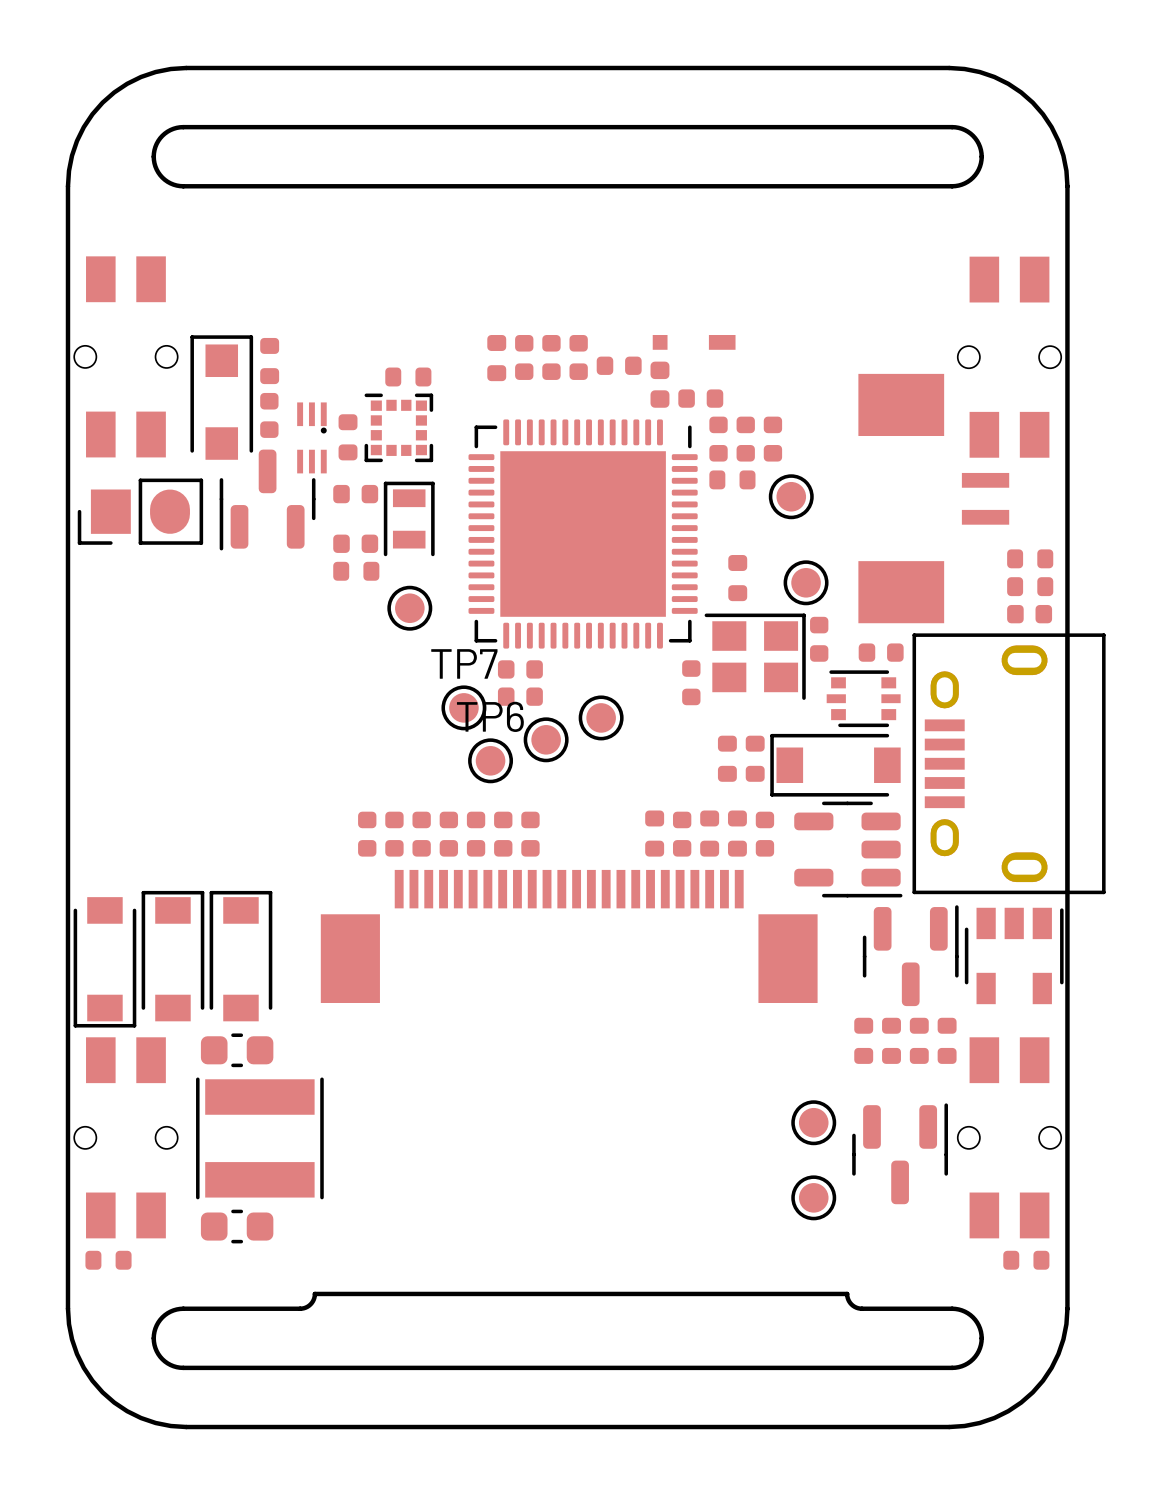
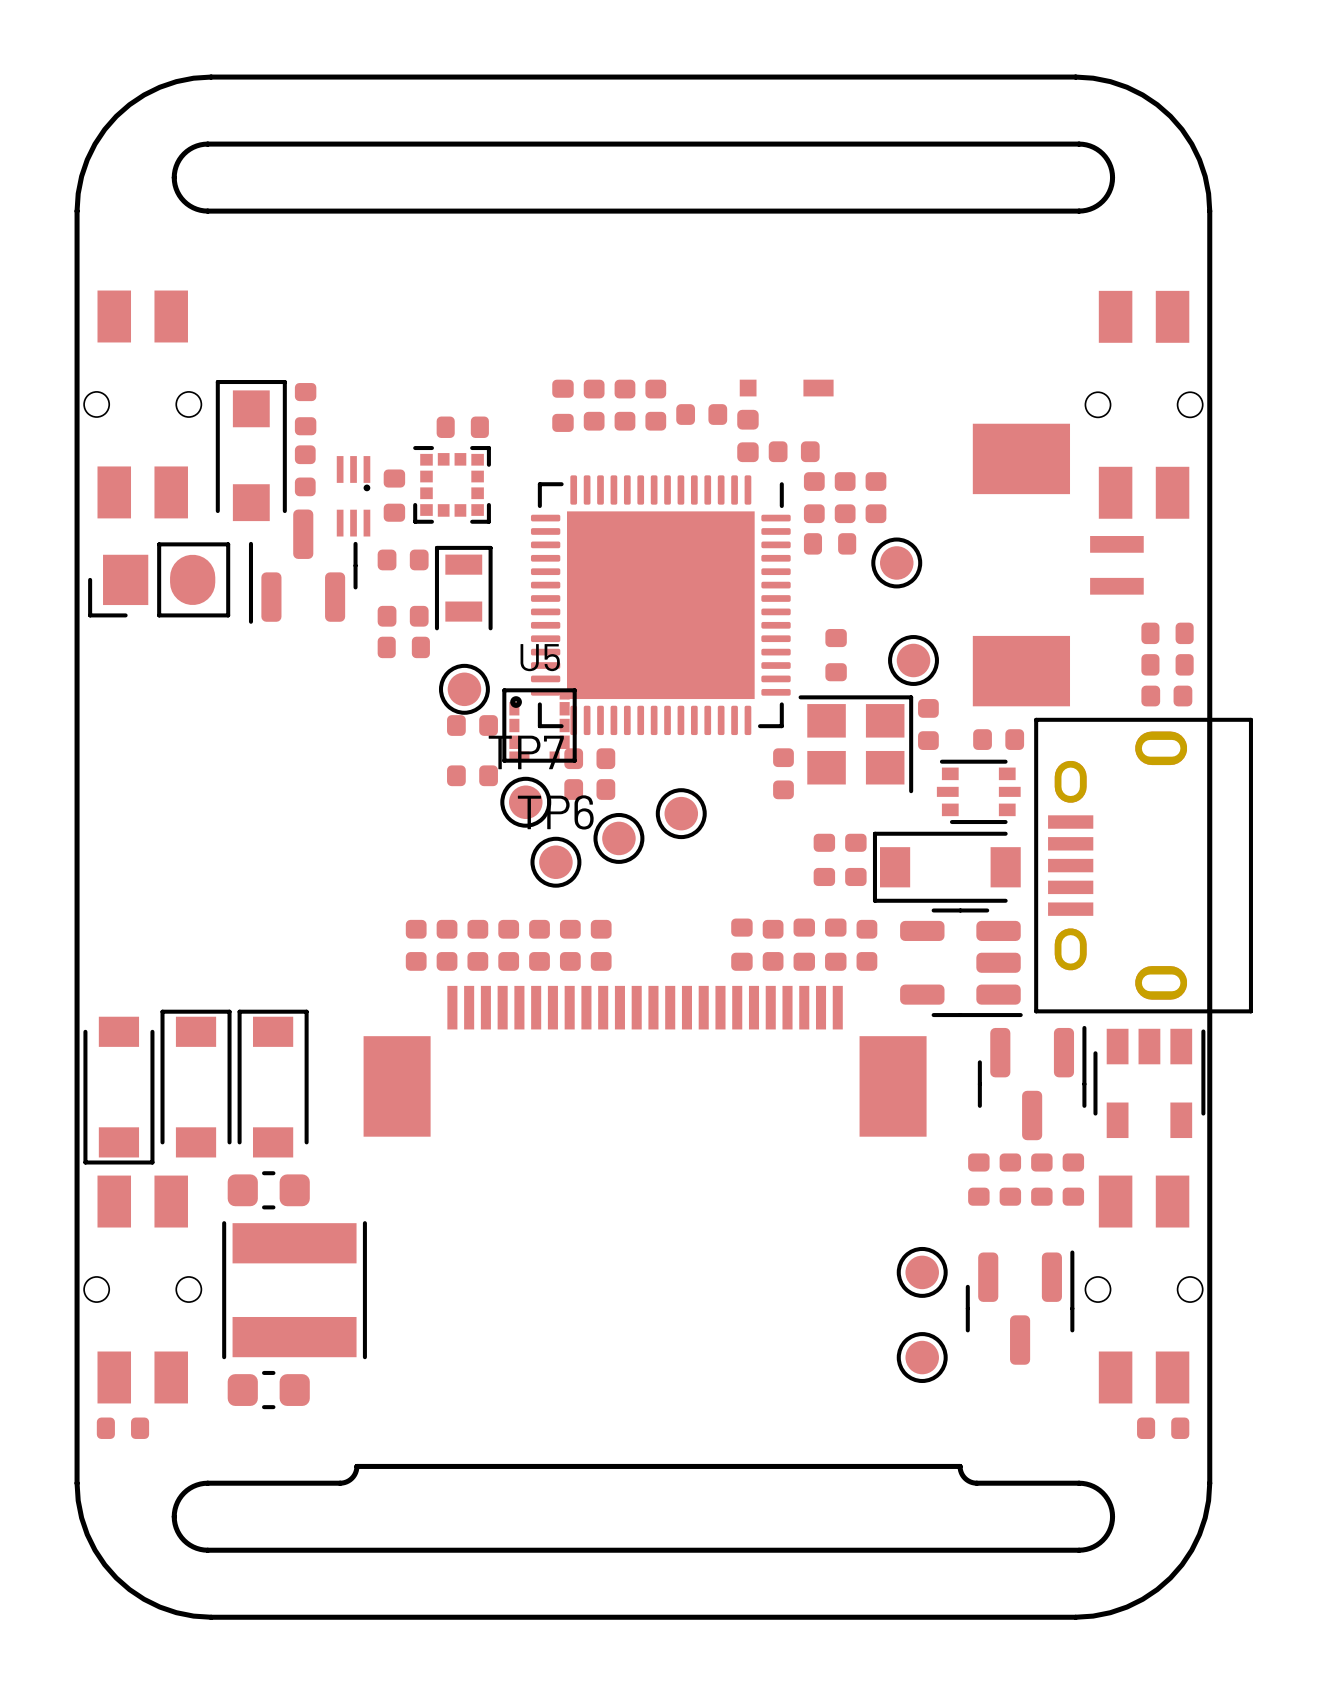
part: none -> (472, 725)
U5: none -> (539, 725)
part: none -> (472, 775)

